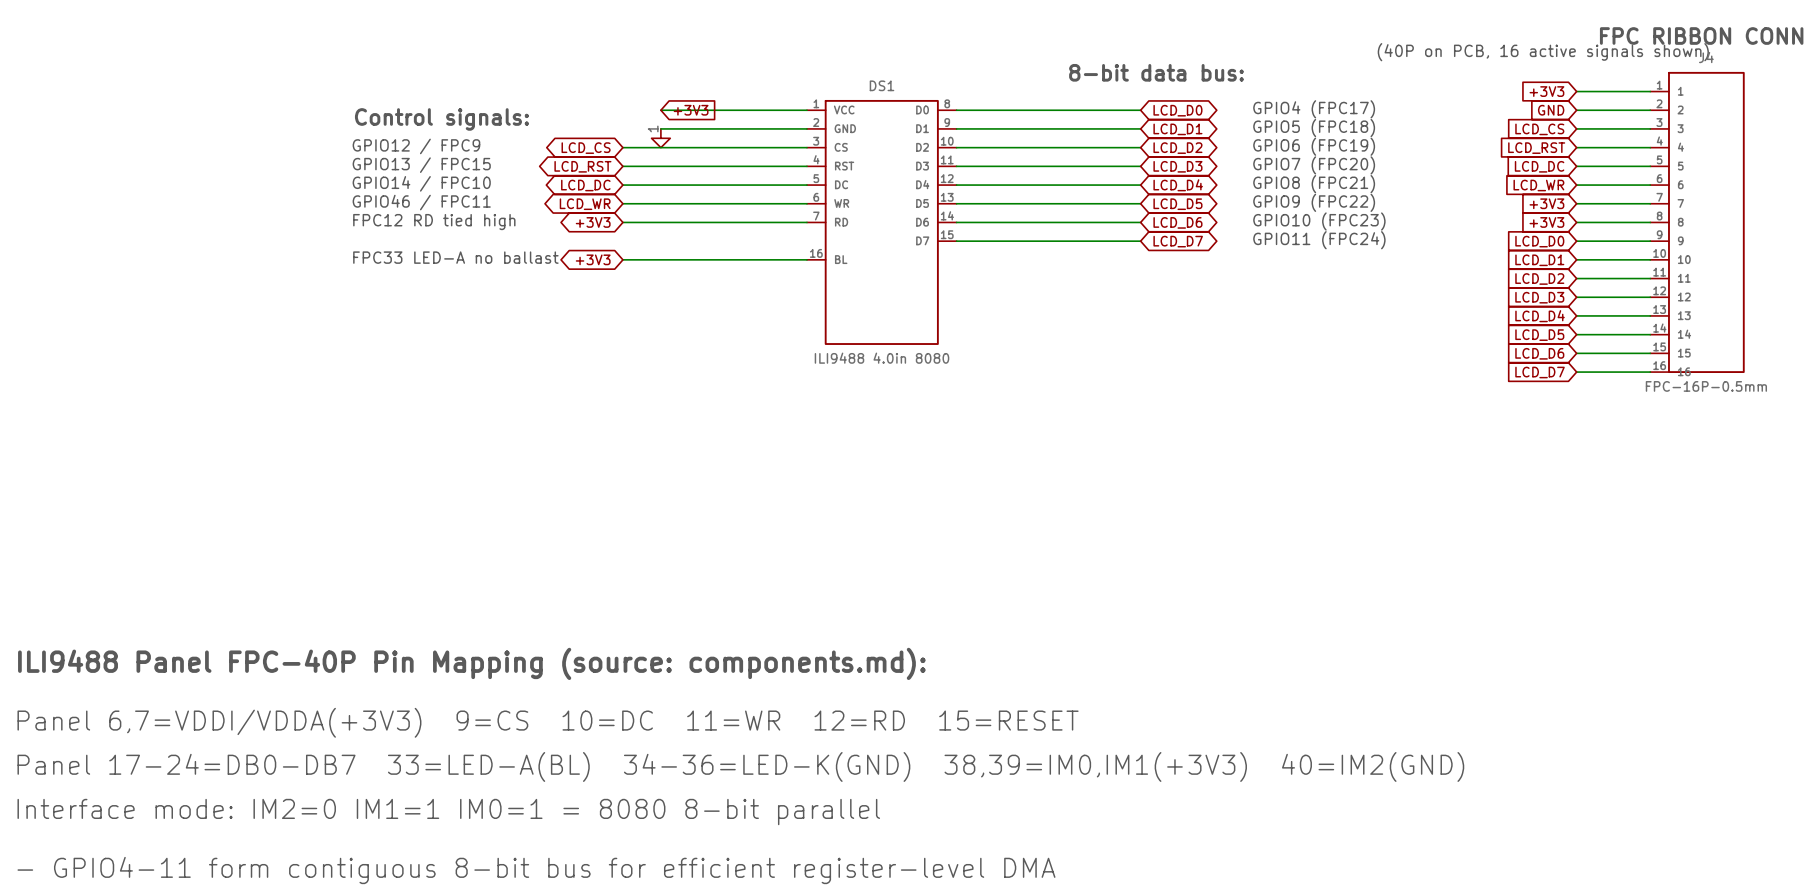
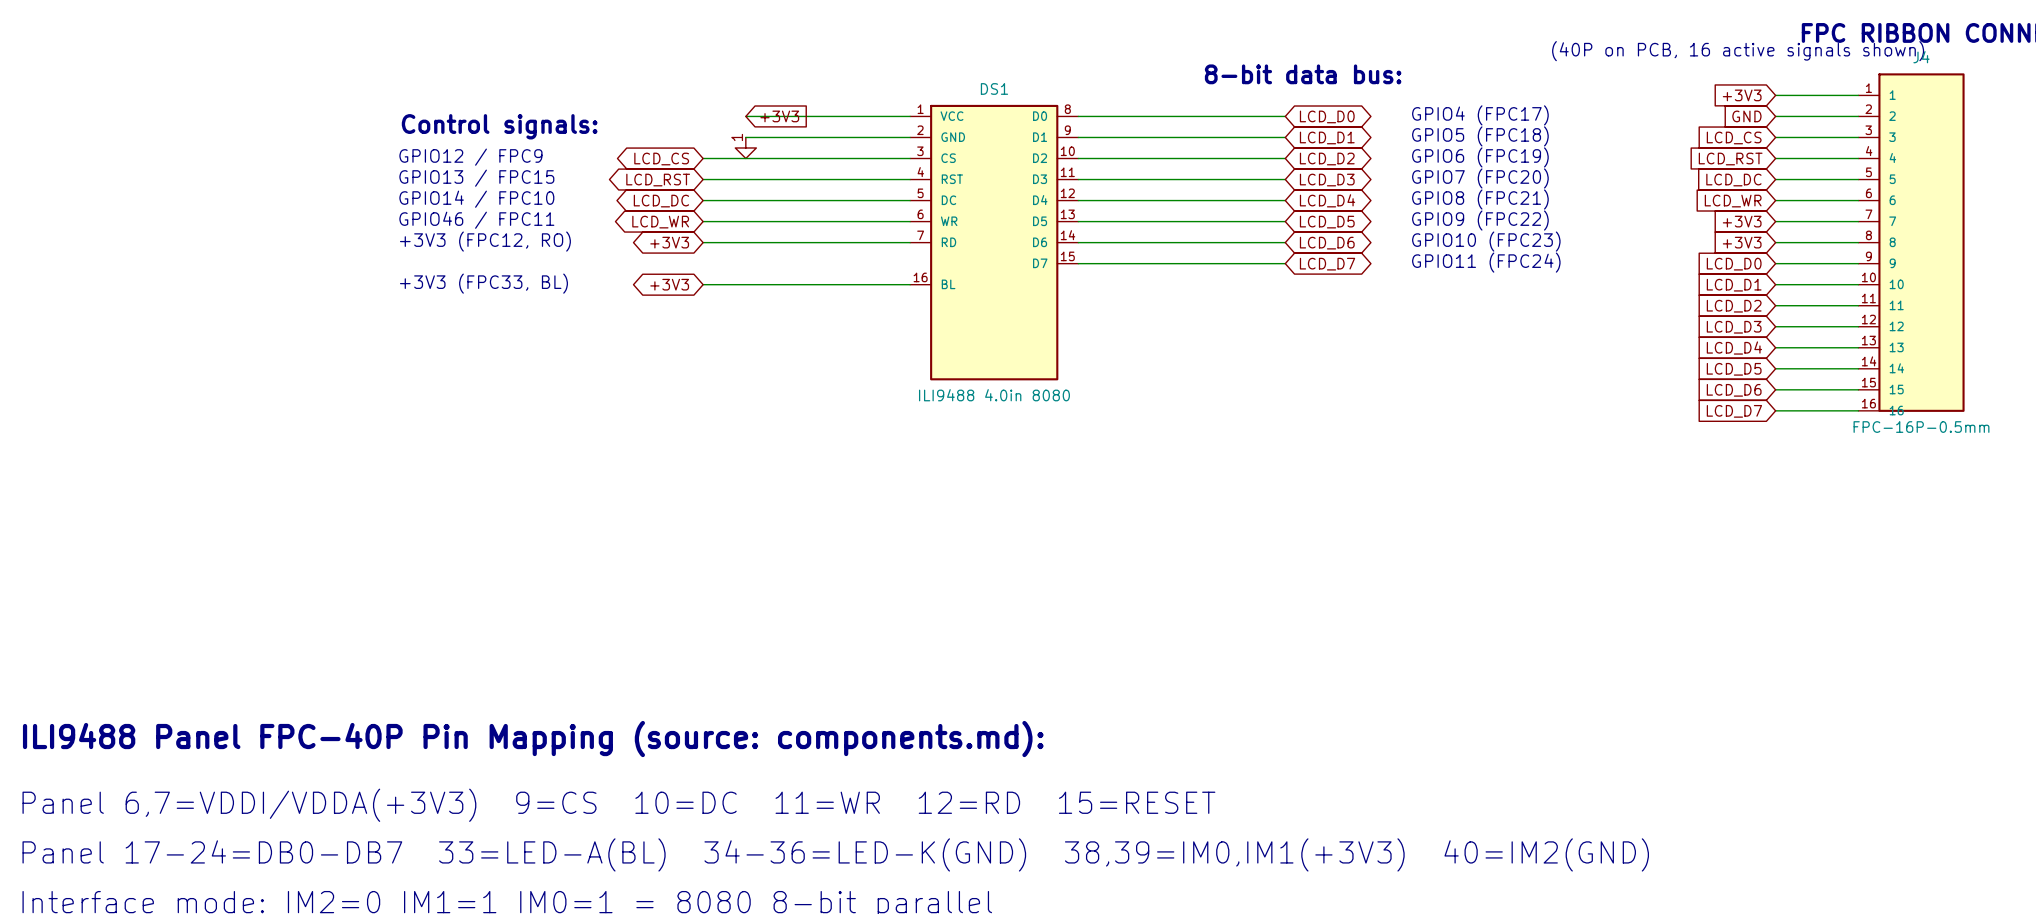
text: FPC12 RD tied high (434, 222) -> +3V3 (FPC12, RO) (485, 241)
text: FPC33 LED-A no ballast (455, 257) -> +3V3 (FPC33, BL) (483, 283)

